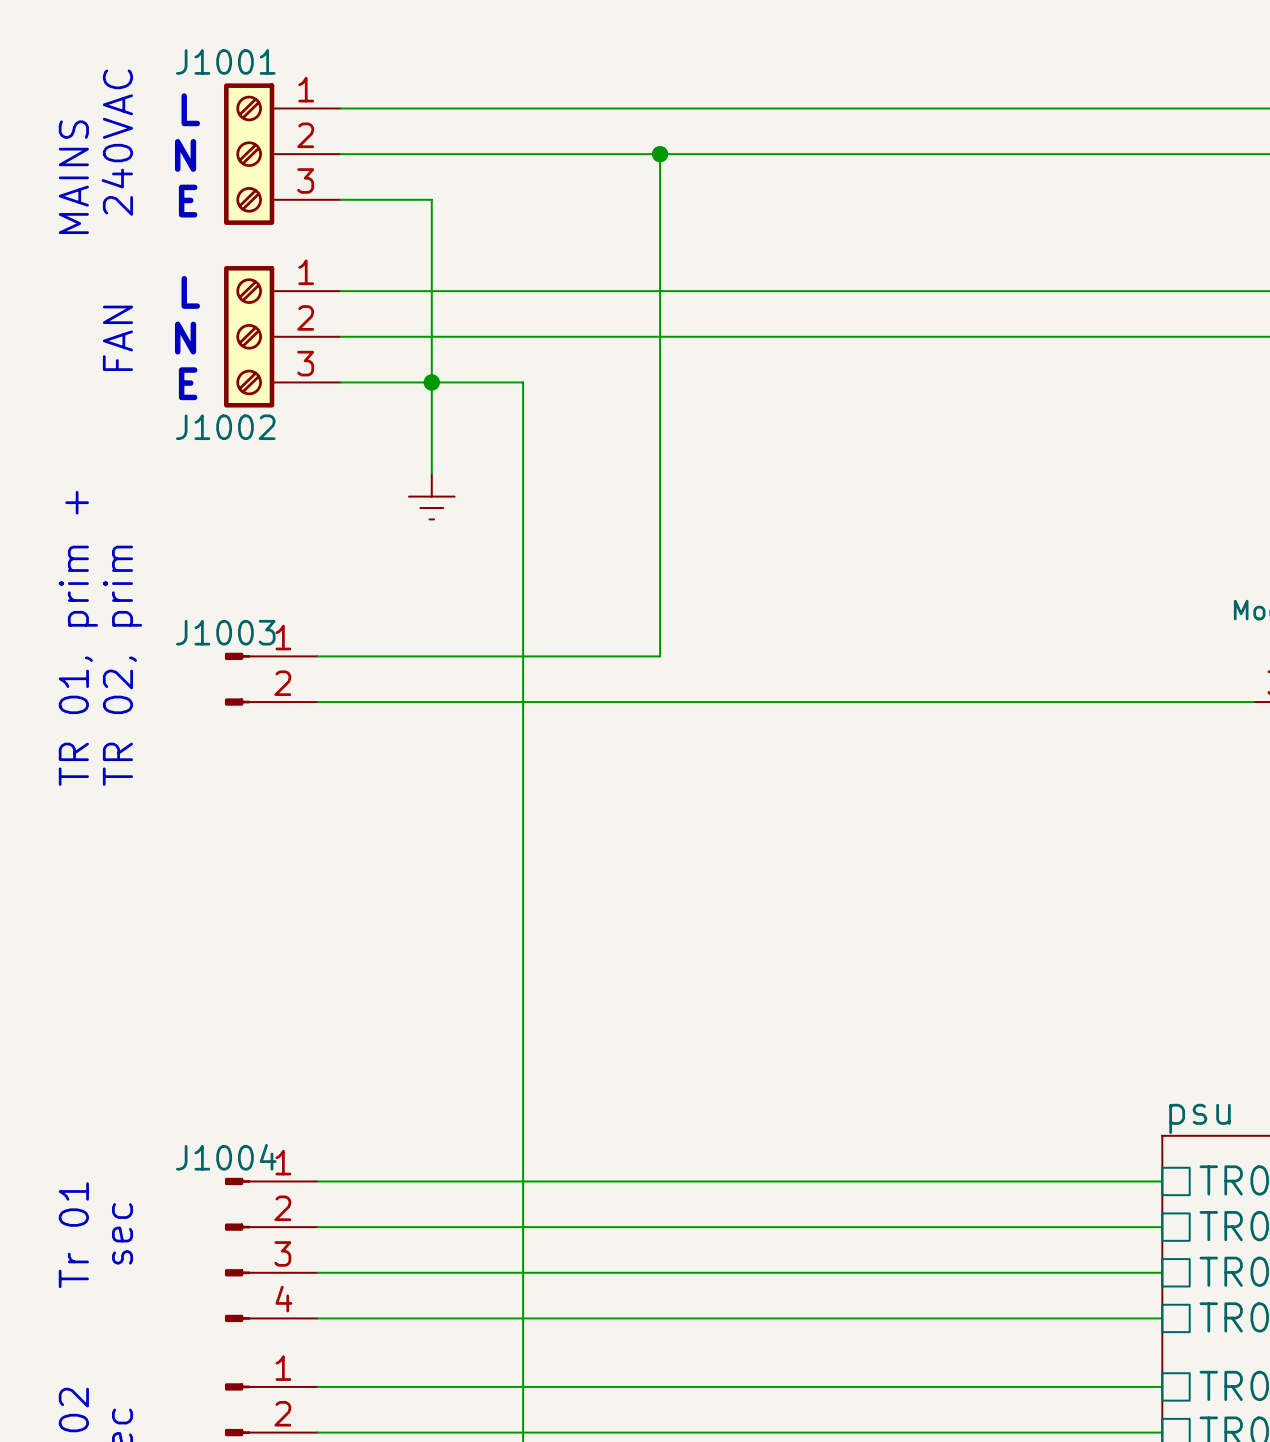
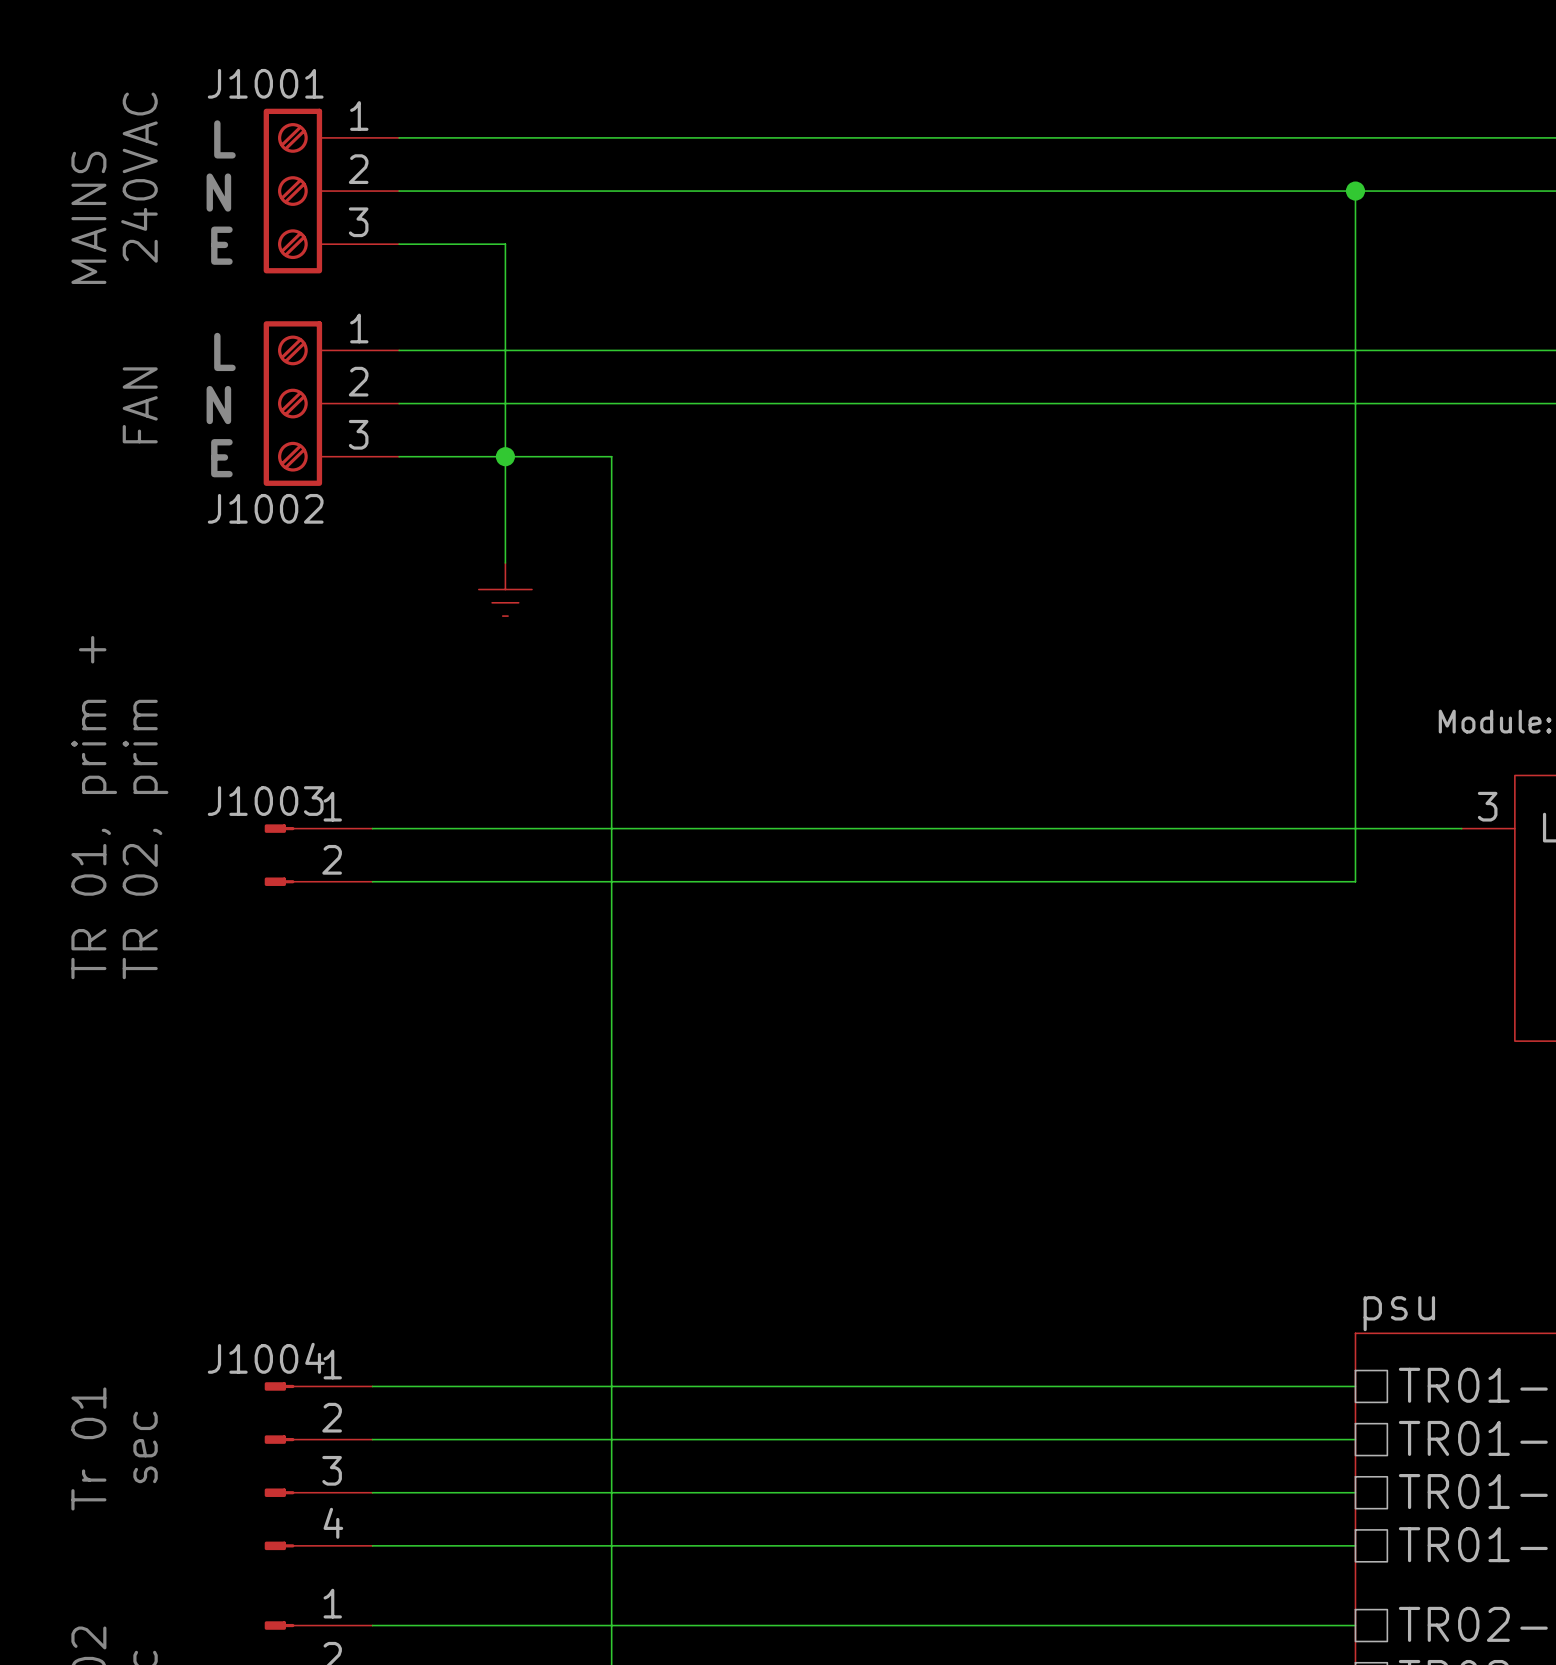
wire: (660, 154) (660, 656) (317, 656) -> none
junction: (660, 154) -> none
wire: none -> (1355, 191) (1355, 881) (372, 881)
junction: none -> (1355, 191)
text position: TR 01, prim + (78, 638) -> TR 01, prim + (94, 807)
text position: TR 02, prim (122, 665) -> TR 02, prim (145, 839)
J1003 position: (271, 679) -> (318, 855)

